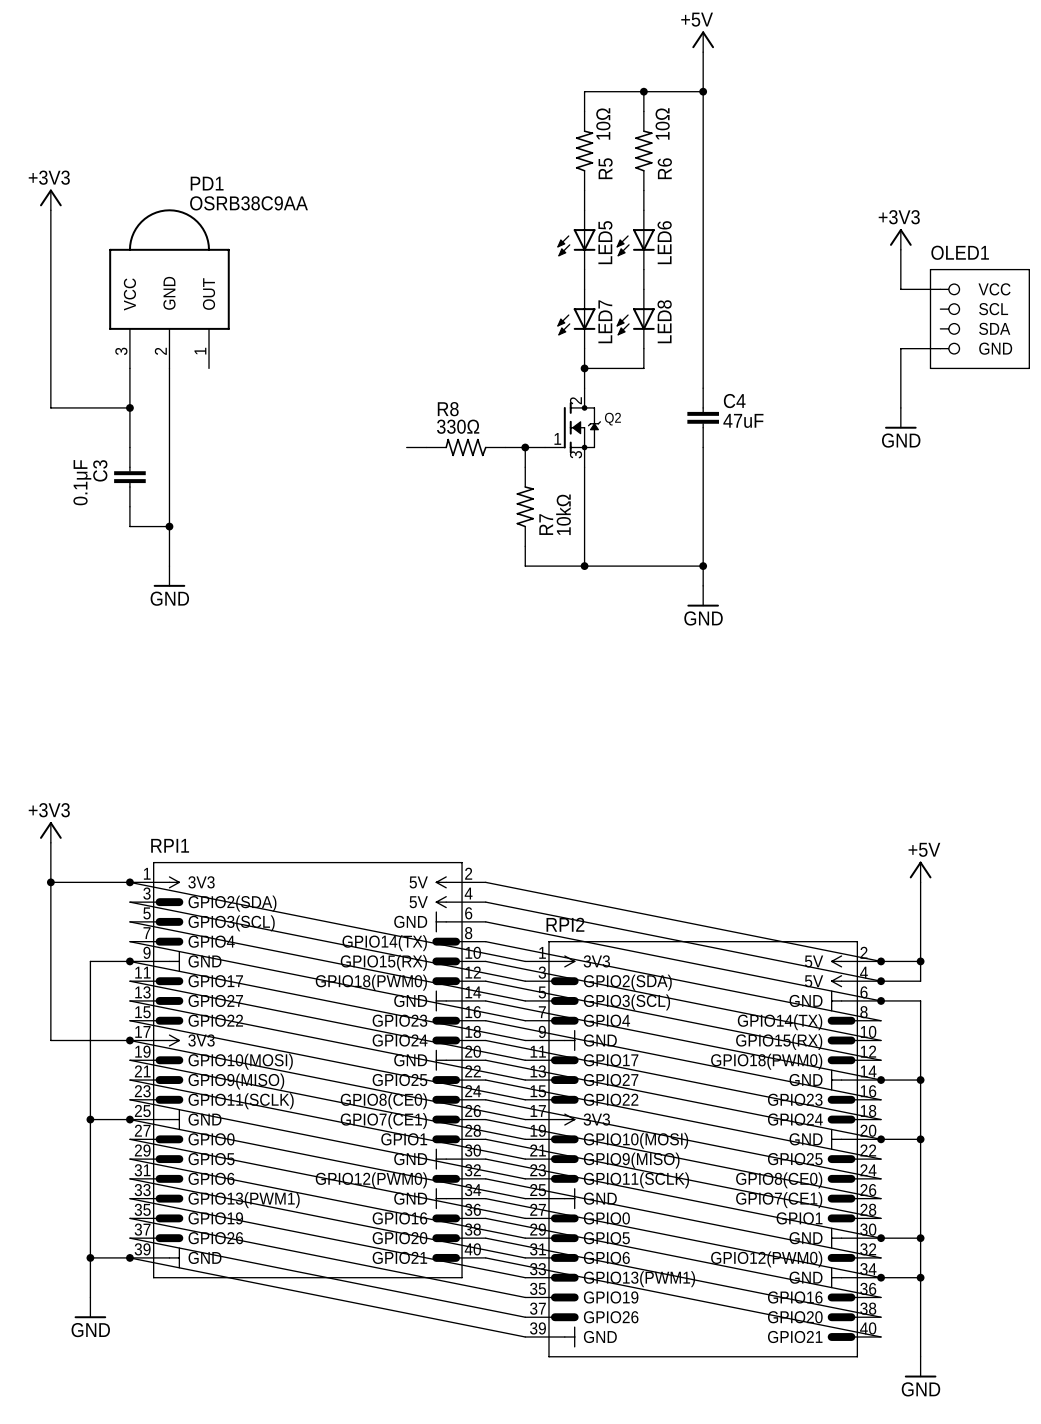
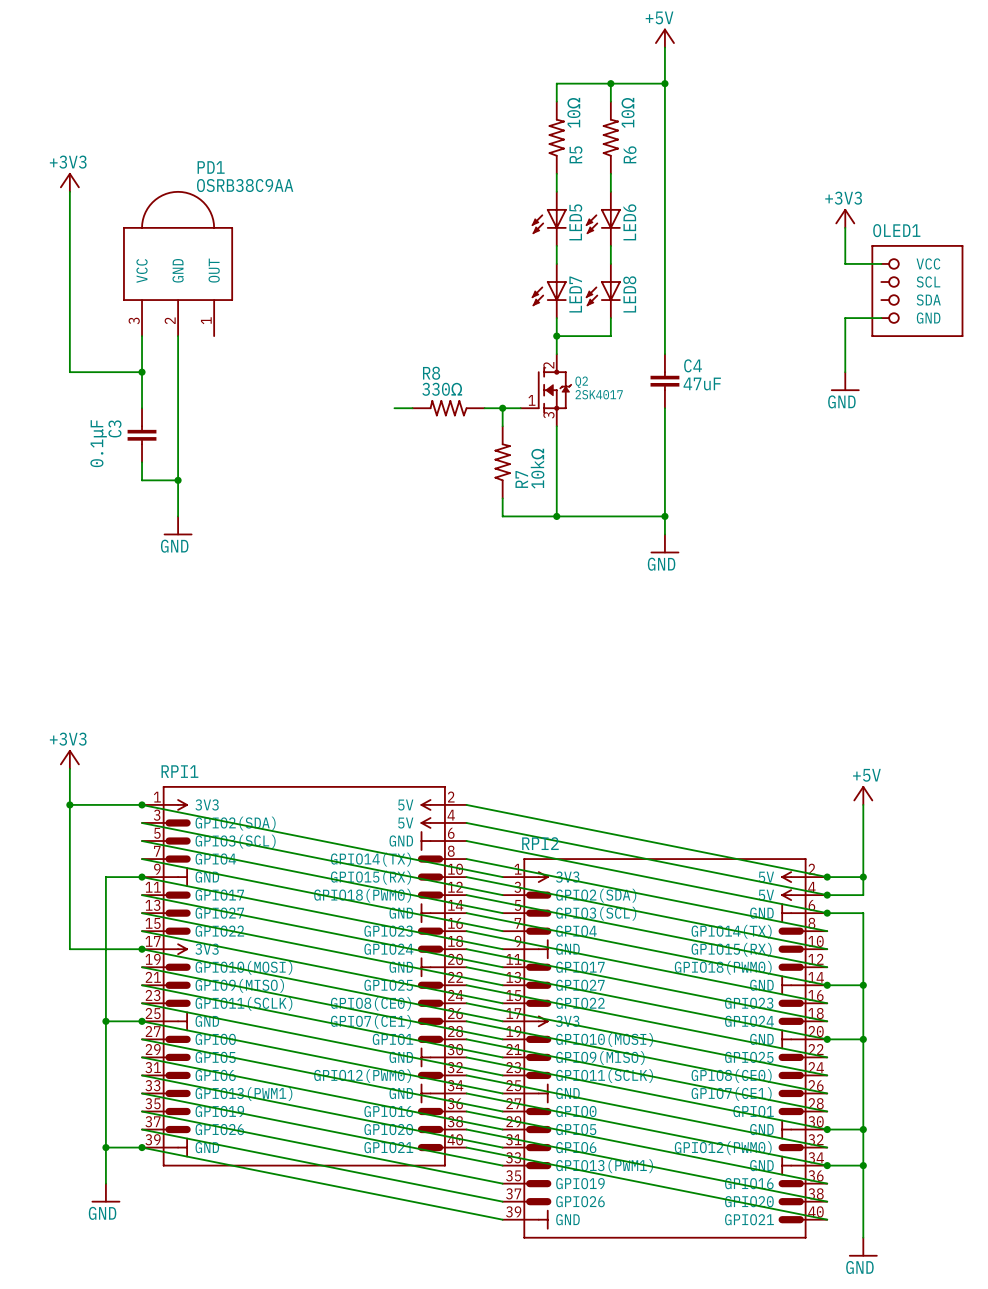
Q2 value: none -> 2SK4017 (599, 394)

